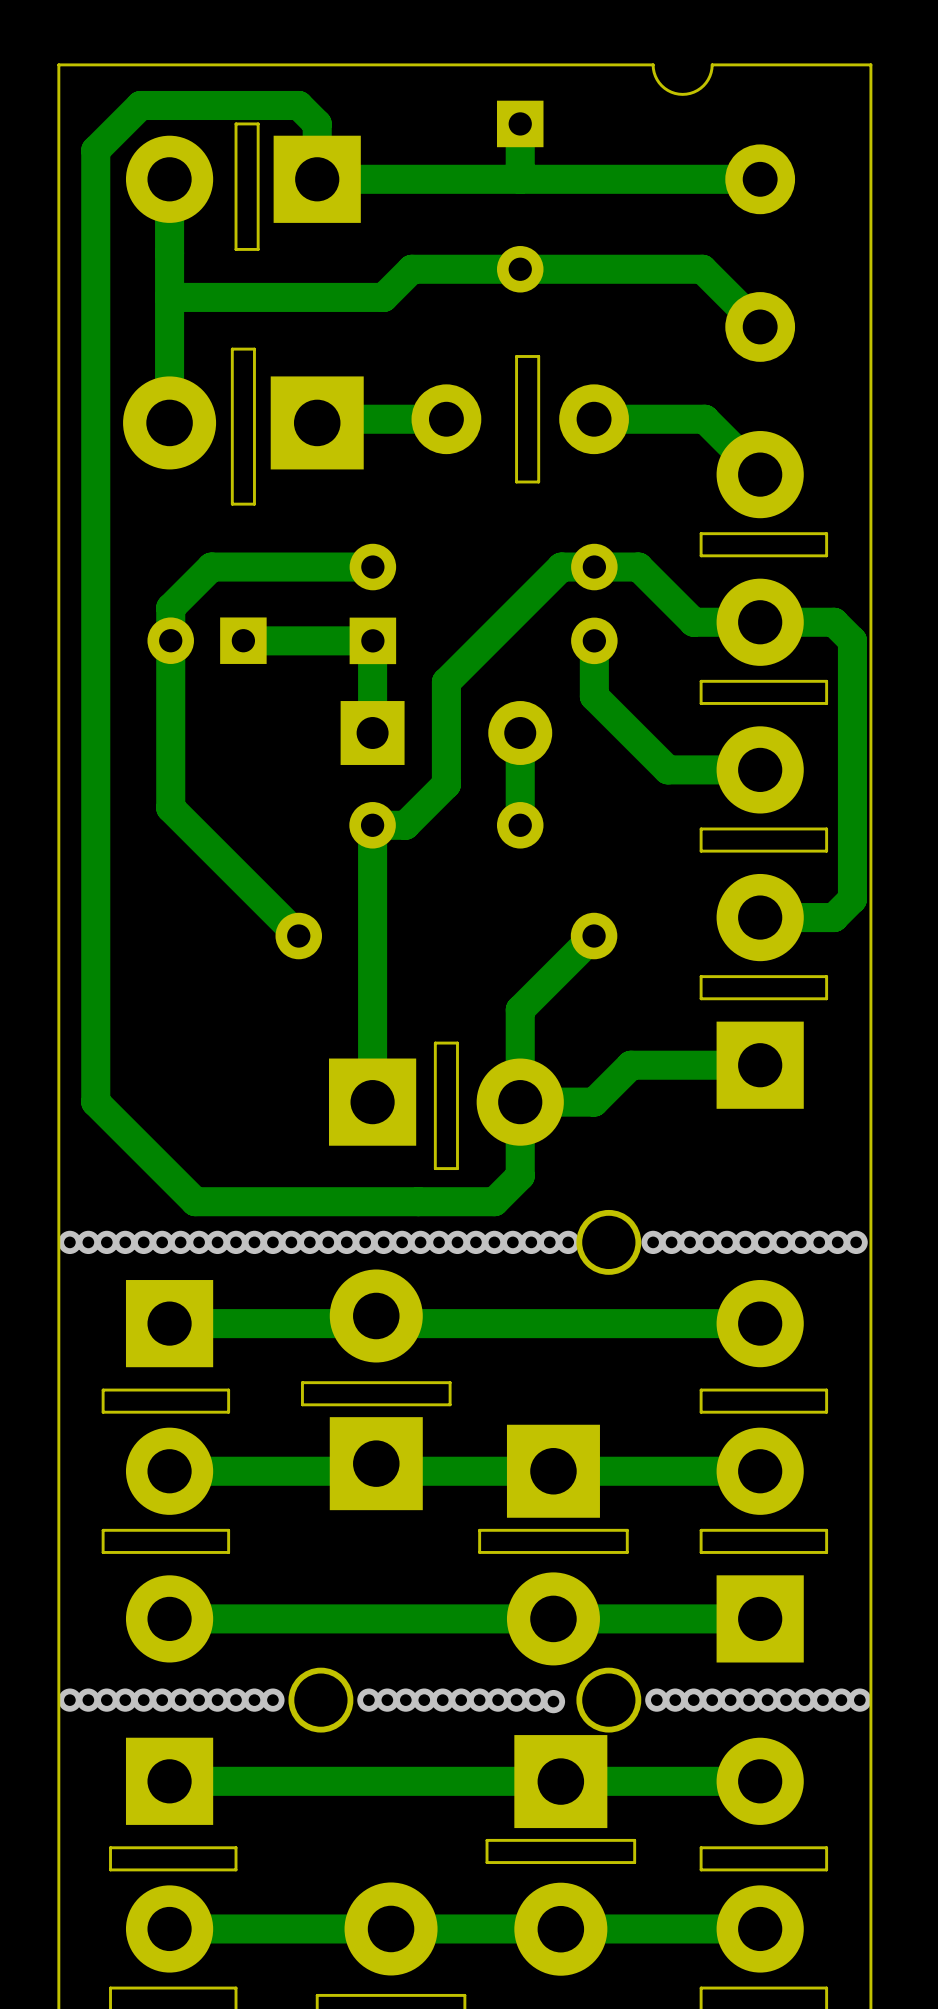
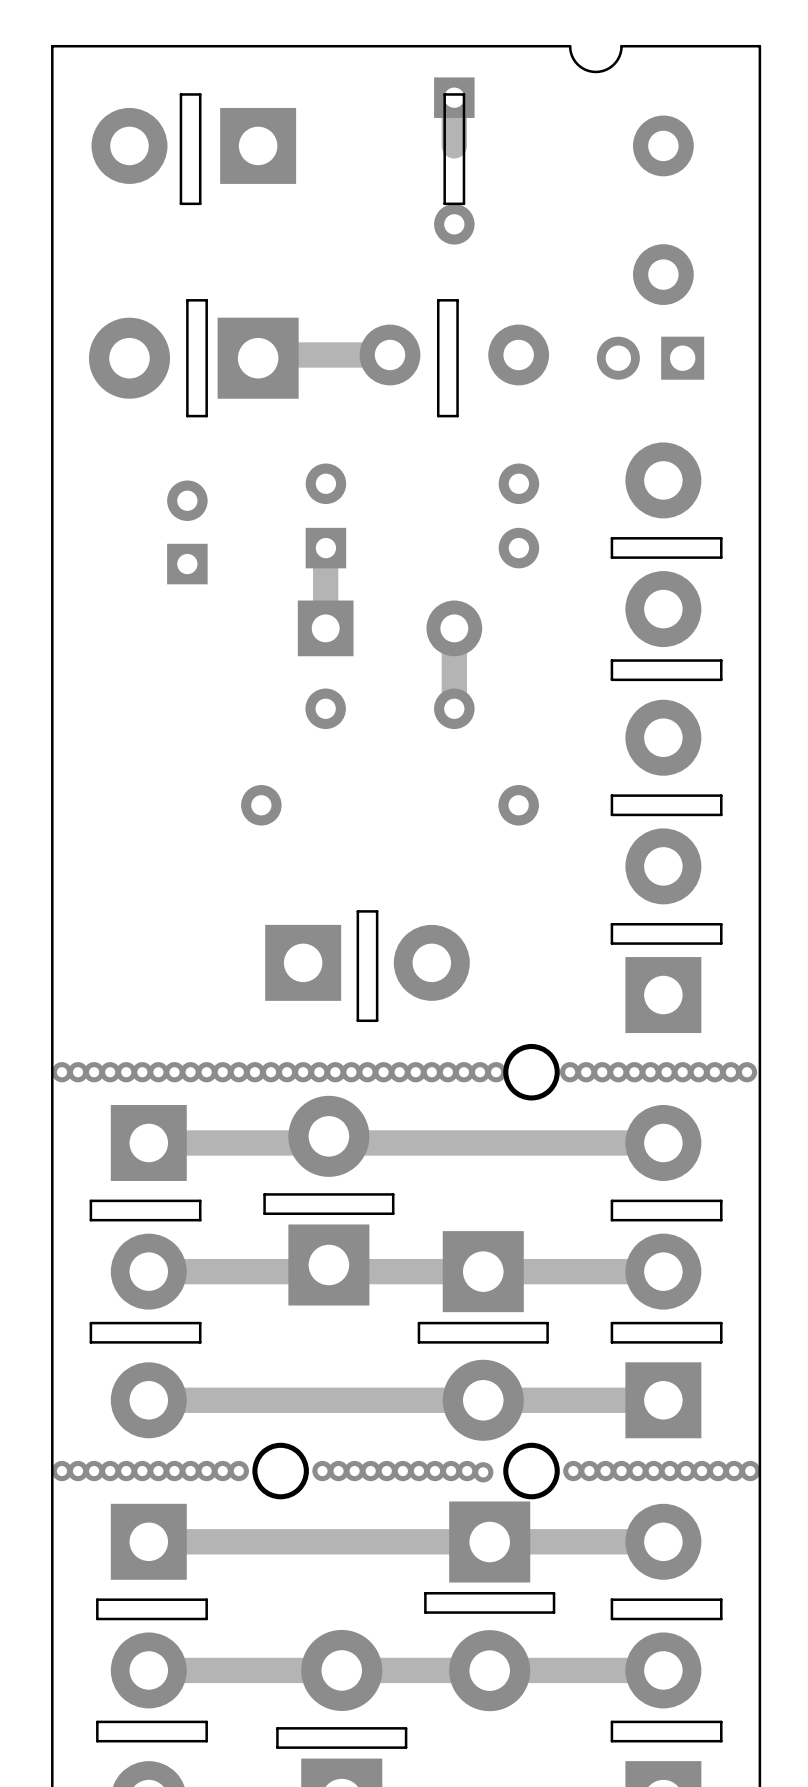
board edge: none -> (463, 94) (444, 94) (444, 203) (463, 203) (463, 94)
board edge: (258, 123) (236, 123) (236, 249) (258, 249) (258, 123) -> (200, 94) (180, 94) (180, 203) (200, 203) (200, 94)
track: (169, 179) (169, 422) -> none
part position: (243, 179) -> (193, 145)
track: (760, 179) (317, 179) (317, 123) (298, 105) (140, 105) (95, 150) (95, 1102) (195, 1201) (494, 1201) (520, 1175) (520, 1009) (594, 936) -> none
track: (169, 297) (383, 297) (411, 269) (702, 269) (760, 326) -> none
board edge: (254, 349) (232, 349) (232, 504) (254, 504) (254, 349) -> none
board edge: none -> (206, 300) (187, 300) (187, 416) (206, 416) (206, 300)
board edge: (523, 356) (538, 356) (538, 481) (516, 481) (516, 356) -> (457, 300) (457, 416) (438, 416) (438, 300) (451, 300)
track: (594, 419) (704, 419) (760, 474) -> none
part position: (243, 422) -> (193, 358)
part: none -> (650, 358)
board edge: (826, 533) (826, 555) (701, 555) (701, 533) (826, 533) -> (721, 538) (721, 557) (611, 557) (611, 538) (721, 538)
track: (372, 567) (211, 567) (170, 607) (170, 807) (298, 936) -> none
part rotation: 0° (207, 640) -> 90° clockwise (187, 532)
track: (372, 640) (243, 640) -> none
track: (594, 640) (594, 696) (667, 769) (760, 769) -> none
board edge: (826, 681) (701, 681) (701, 703) (826, 703) (826, 681) -> (721, 660) (611, 660) (611, 679) (721, 679) (721, 660)
part position: (760, 769) -> (663, 737)
board edge: (826, 828) (826, 851) (701, 851) (701, 828) (826, 828) -> (721, 795) (721, 814) (611, 814) (611, 795) (721, 795)
track: (760, 917) (834, 917) (852, 899) (852, 640) (834, 622) (693, 622) (638, 567) (561, 567) (446, 682) (446, 784) (405, 825) (372, 825) (372, 1102) -> none
board edge: (826, 976) (826, 998) (701, 998) (701, 976) (826, 976) -> (721, 924) (721, 943) (611, 943) (611, 924) (721, 924)
board edge: (457, 1043) (435, 1043) (435, 1168) (457, 1168) (457, 1043) -> (377, 911) (357, 911) (357, 1020) (377, 1020) (377, 911)
track: (760, 1065) (630, 1065) (594, 1102) (520, 1102) -> none
part position: (446, 1102) -> (367, 962)

